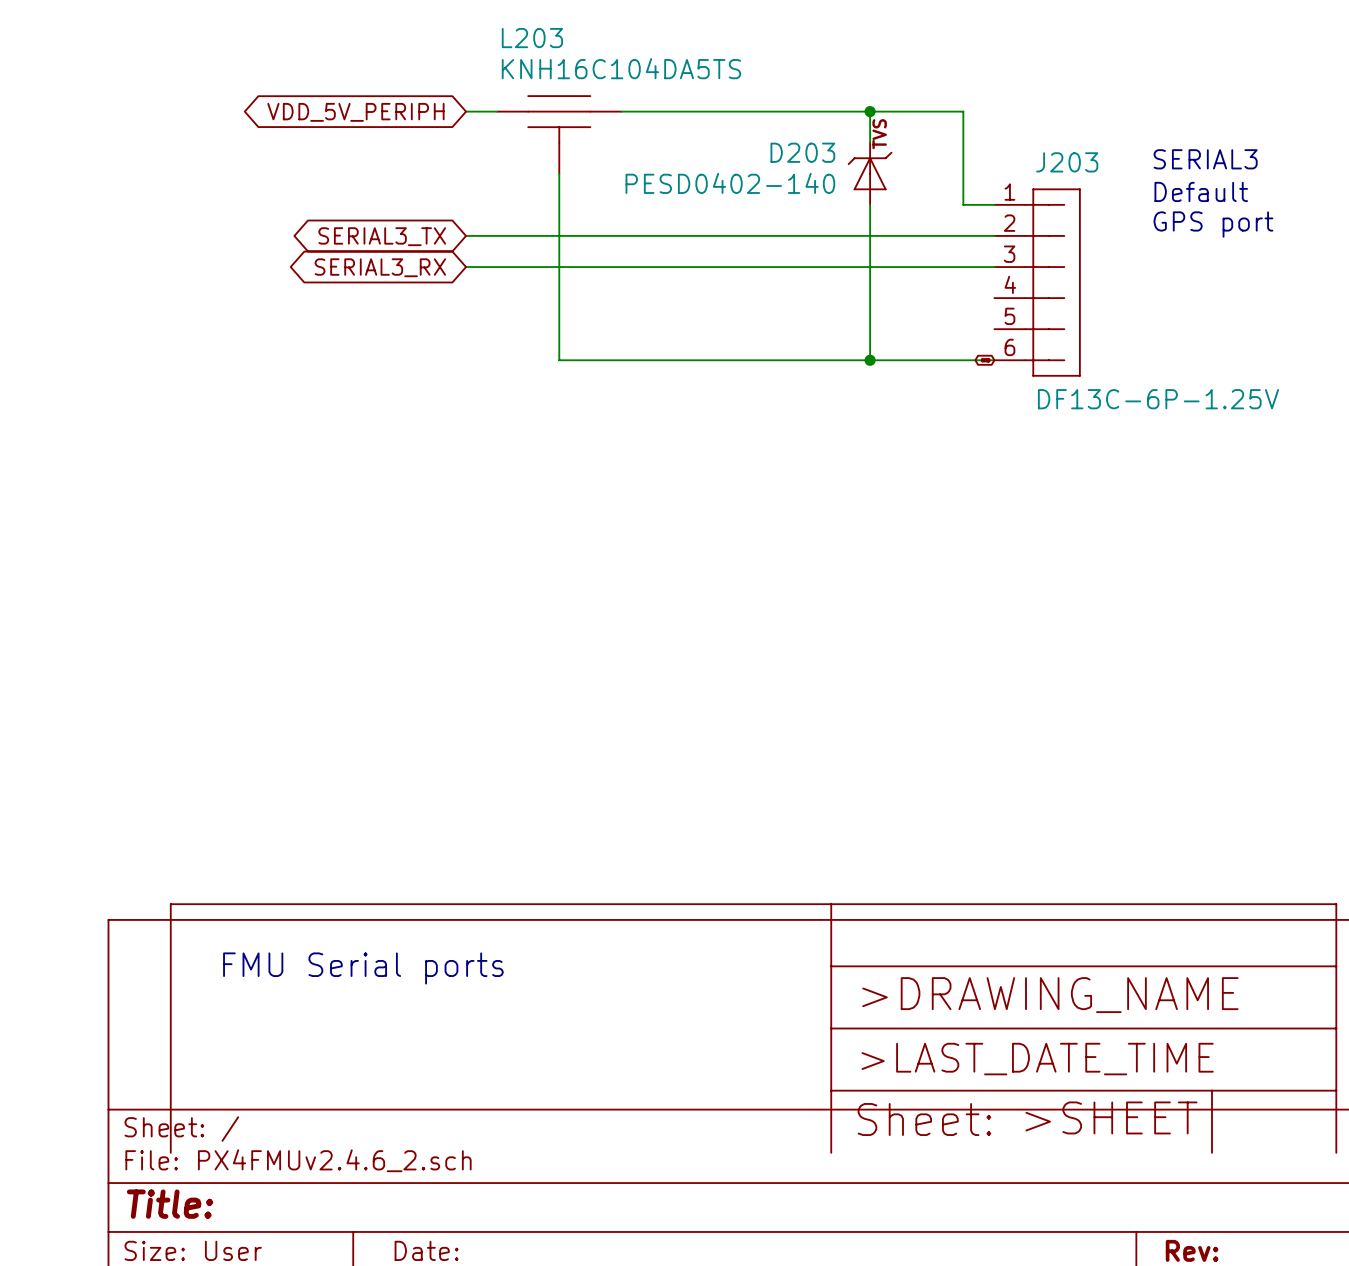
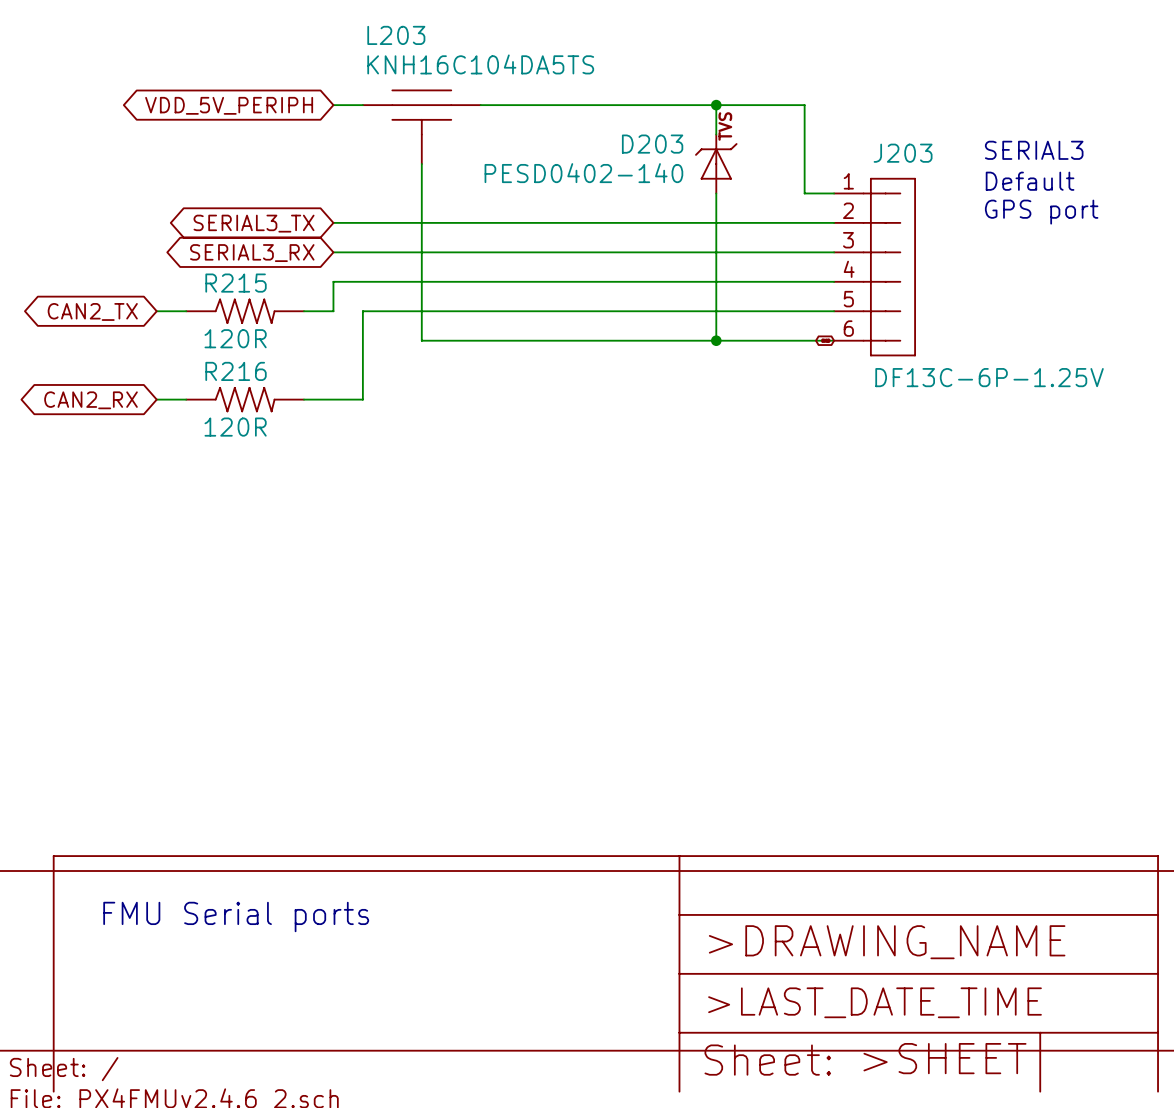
wire: none -> (834, 281) (333, 281) (333, 311) (304, 311)
global label: none -> CAN2_TX (92, 311)
wire: none -> (156, 311) (186, 311)
R215: none -> 120R (245, 311)
wire: none -> (834, 311) (362, 311) (362, 399) (304, 399)
wire: none -> (156, 399) (186, 399)
R216: none -> 120R (245, 399)
global label: none -> CAN2_RX (91, 400)

